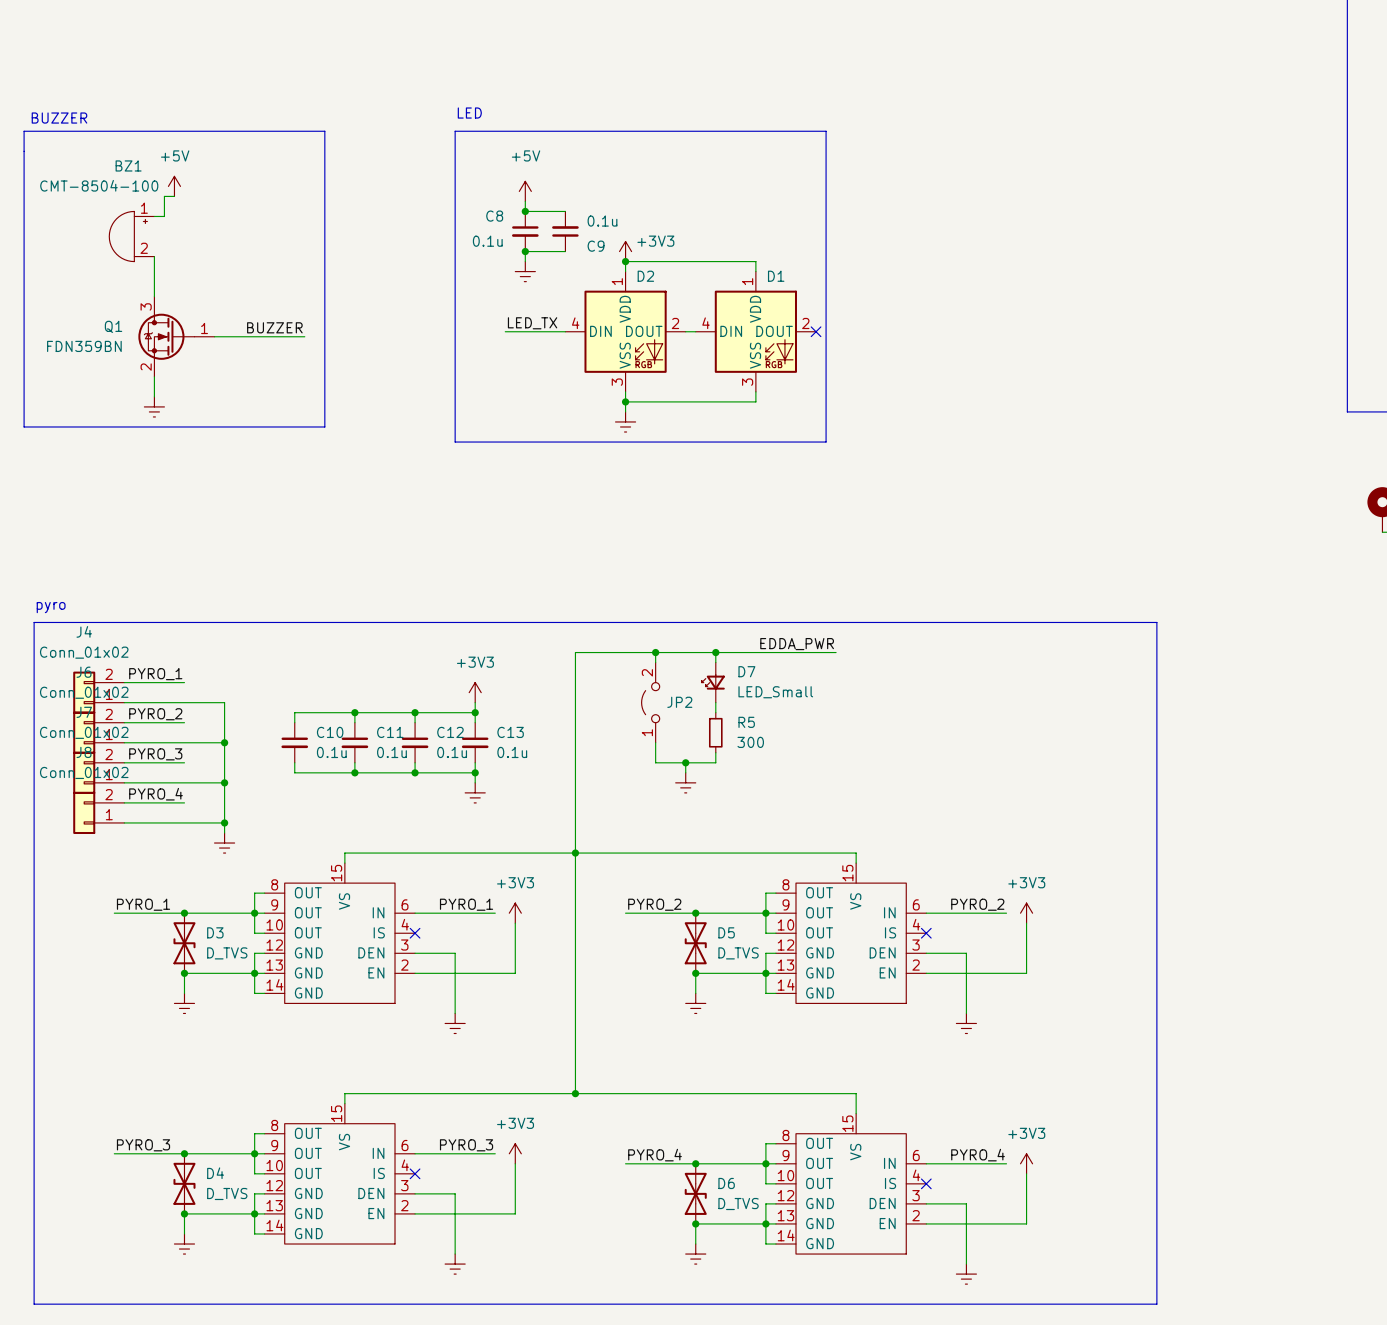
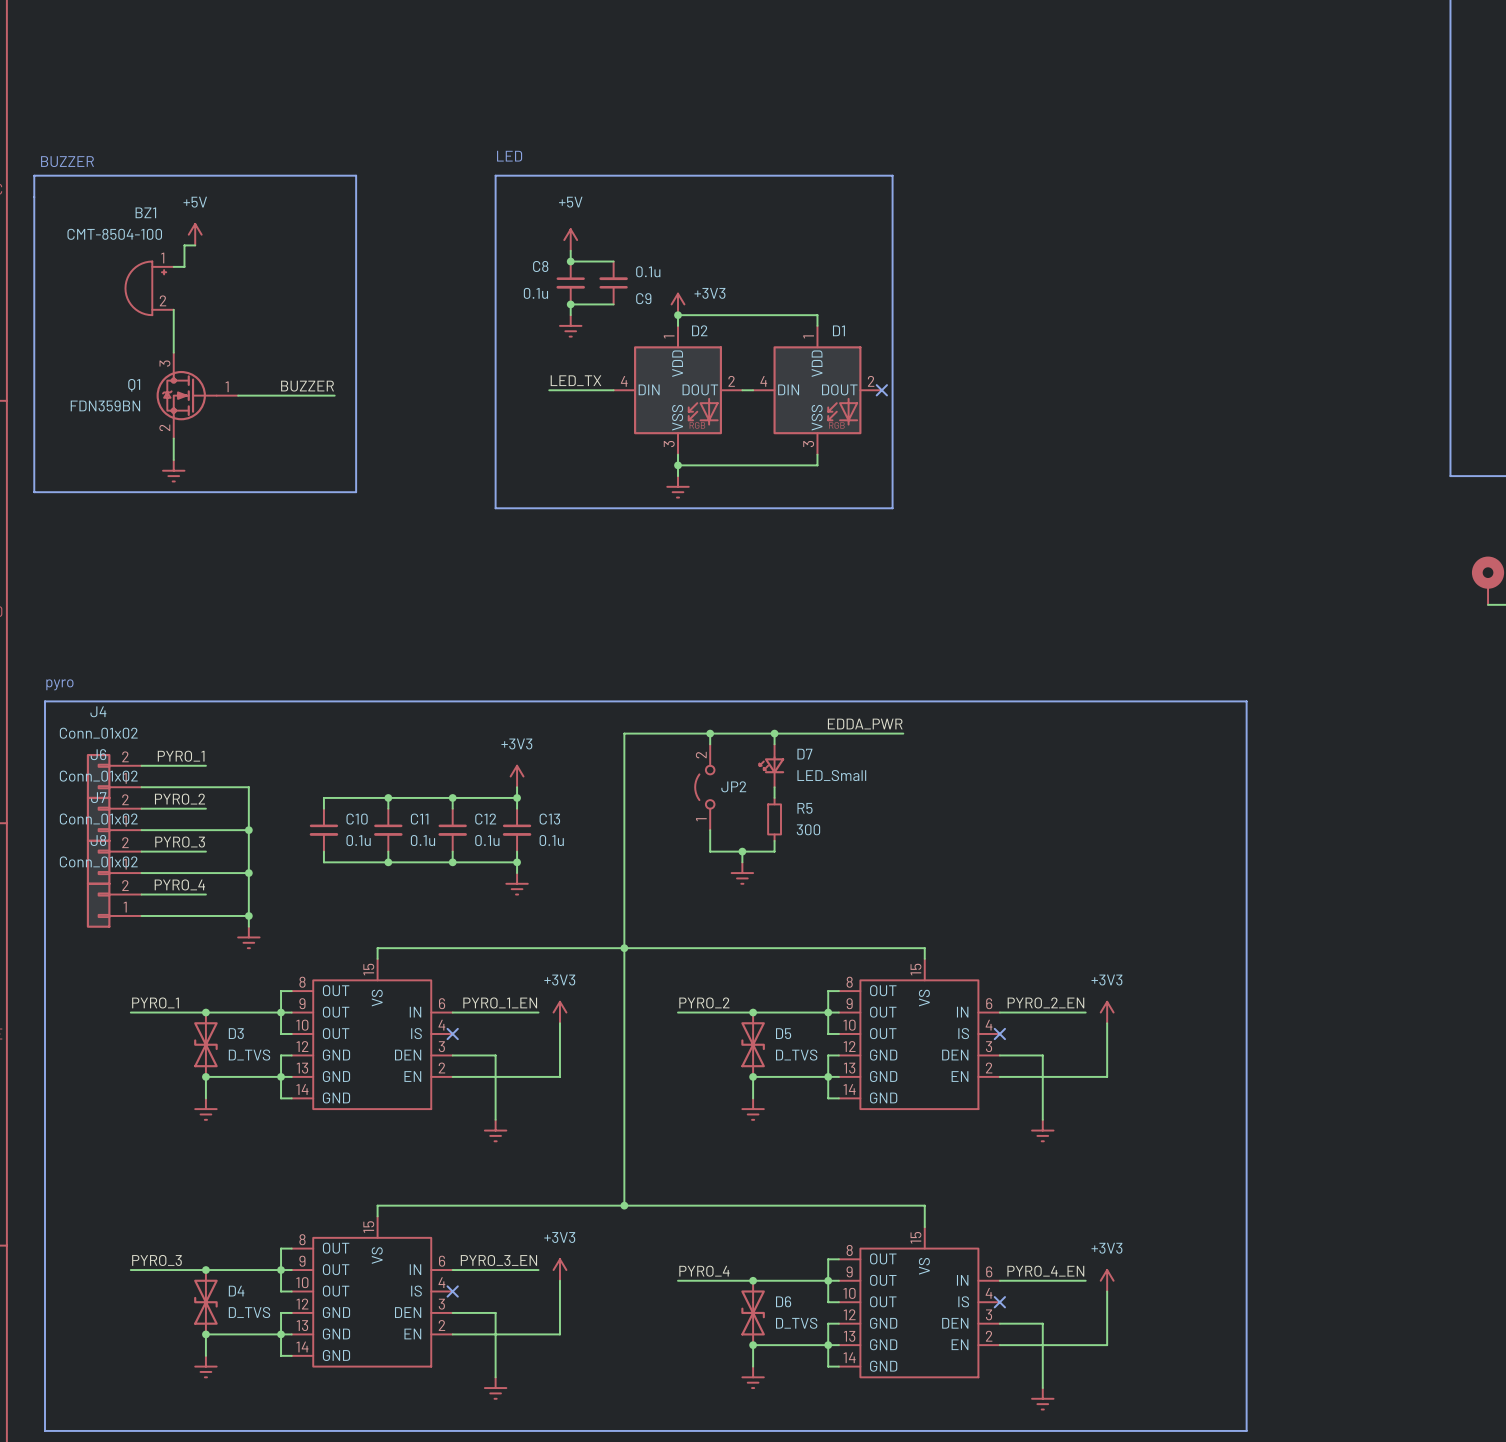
label: PYRO_1 (466, 904) -> PYRO_1_EN (500, 1002)
label: PYRO_2 (977, 904) -> PYRO_2_EN (1045, 1002)
label: PYRO_3 (466, 1145) -> PYRO_3_EN (498, 1260)
label: PYRO_4 (978, 1155) -> PYRO_4_EN (1045, 1271)

